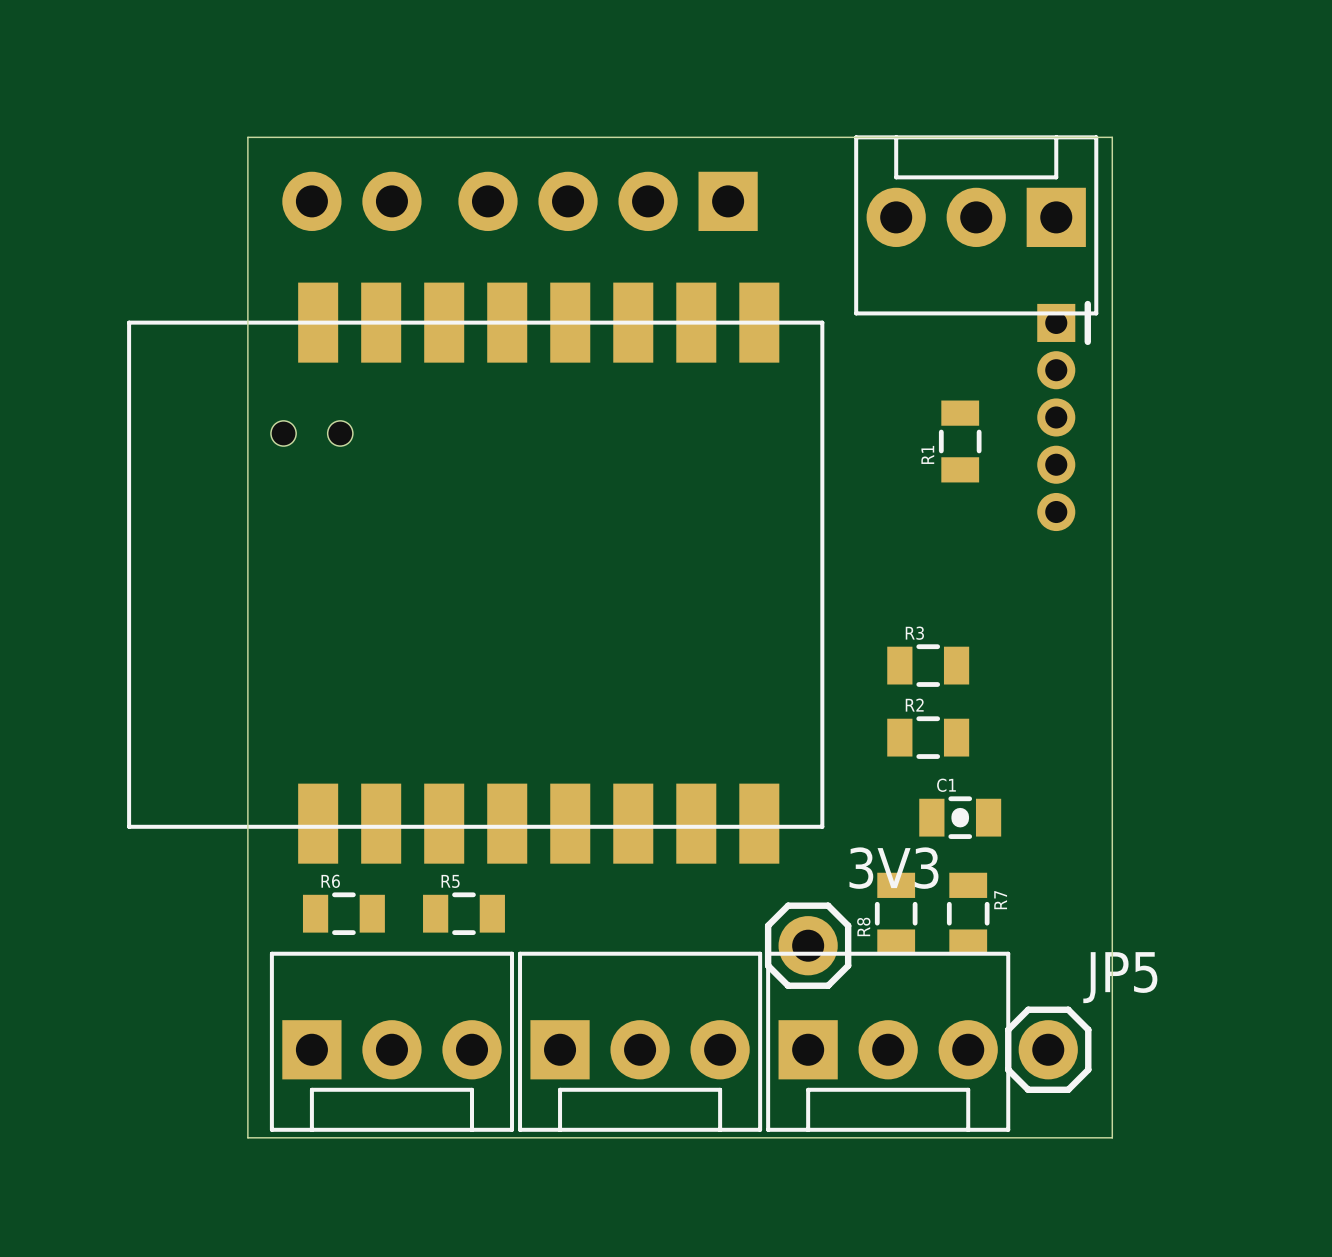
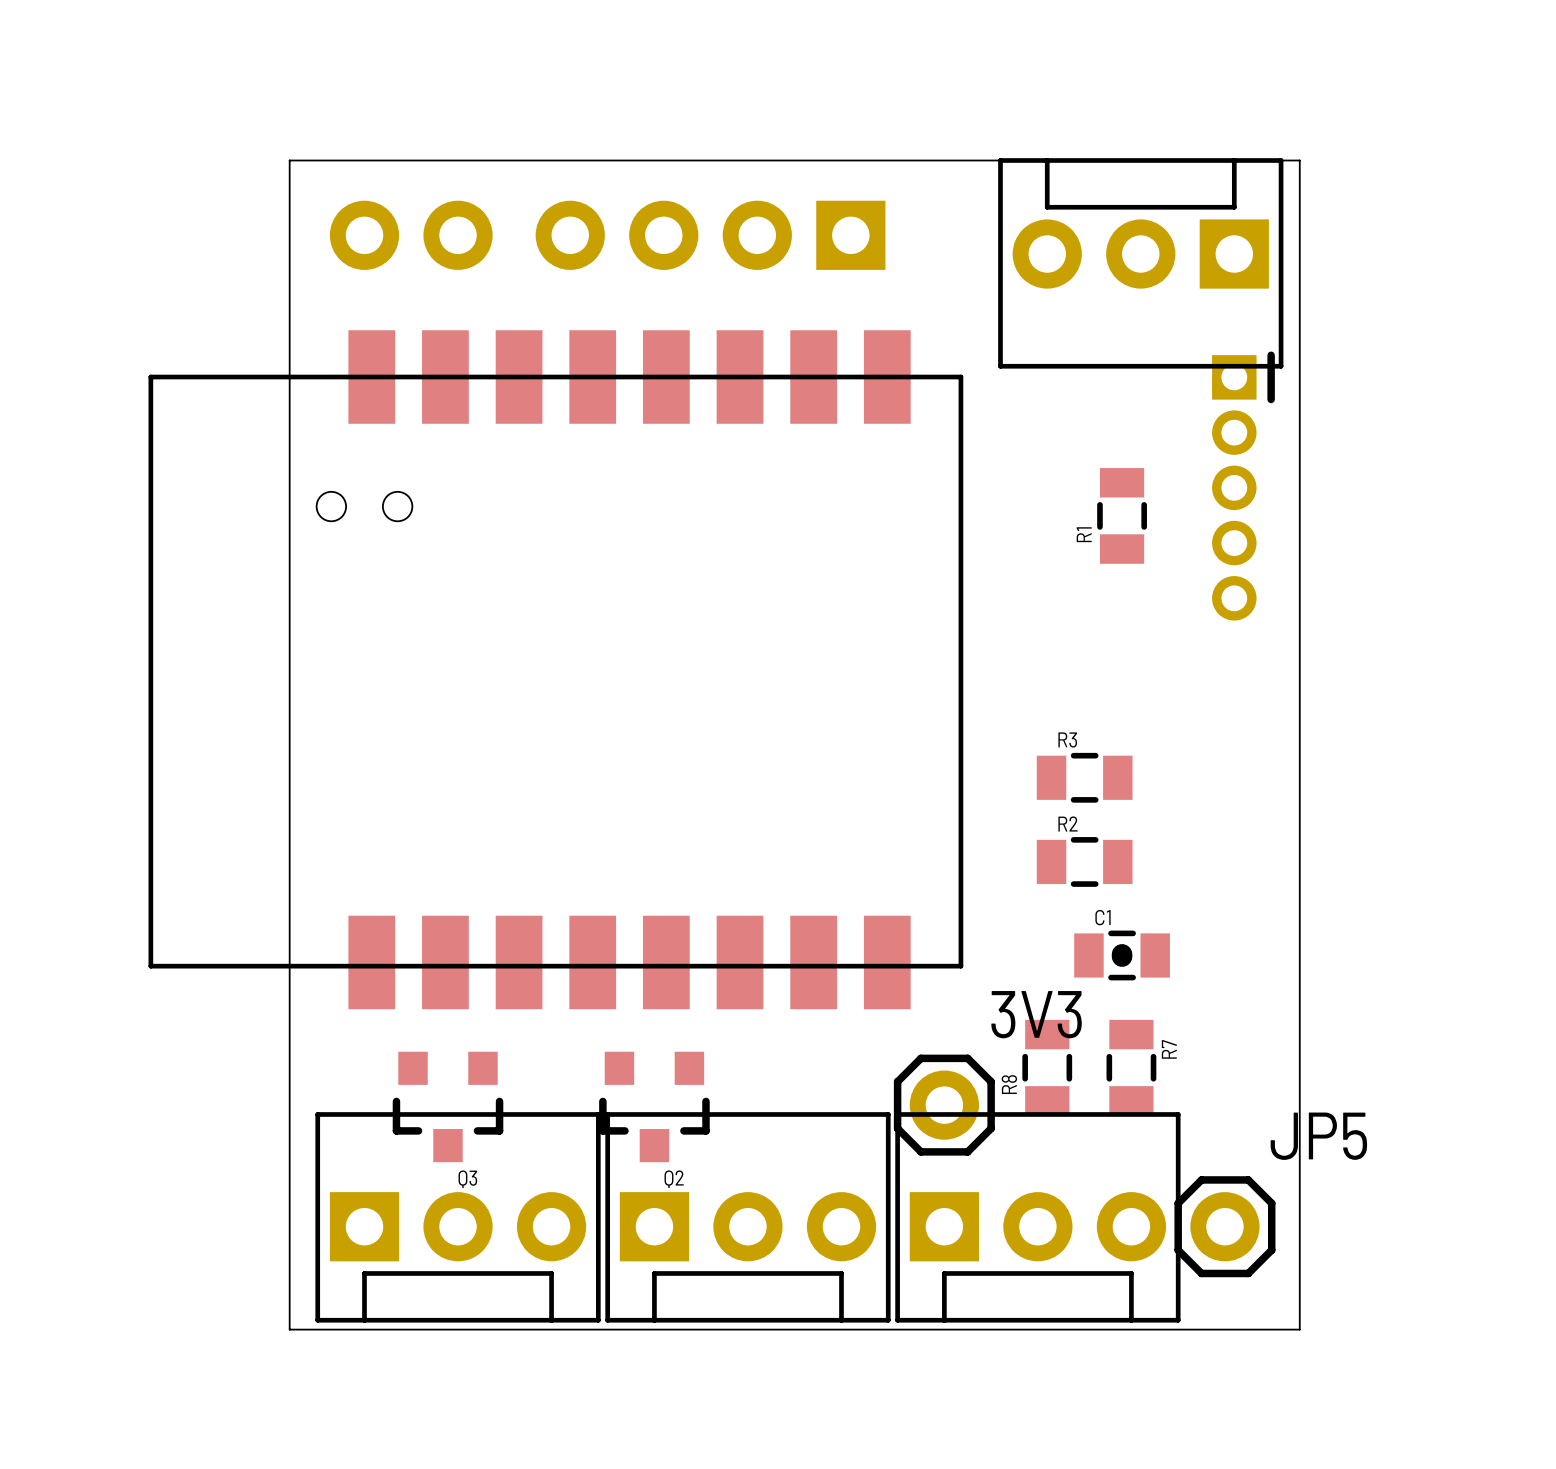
R6: (343, 913) -> none
R5: (463, 913) -> none
Q3: none -> (448, 1106)
Q2: none -> (654, 1106)

